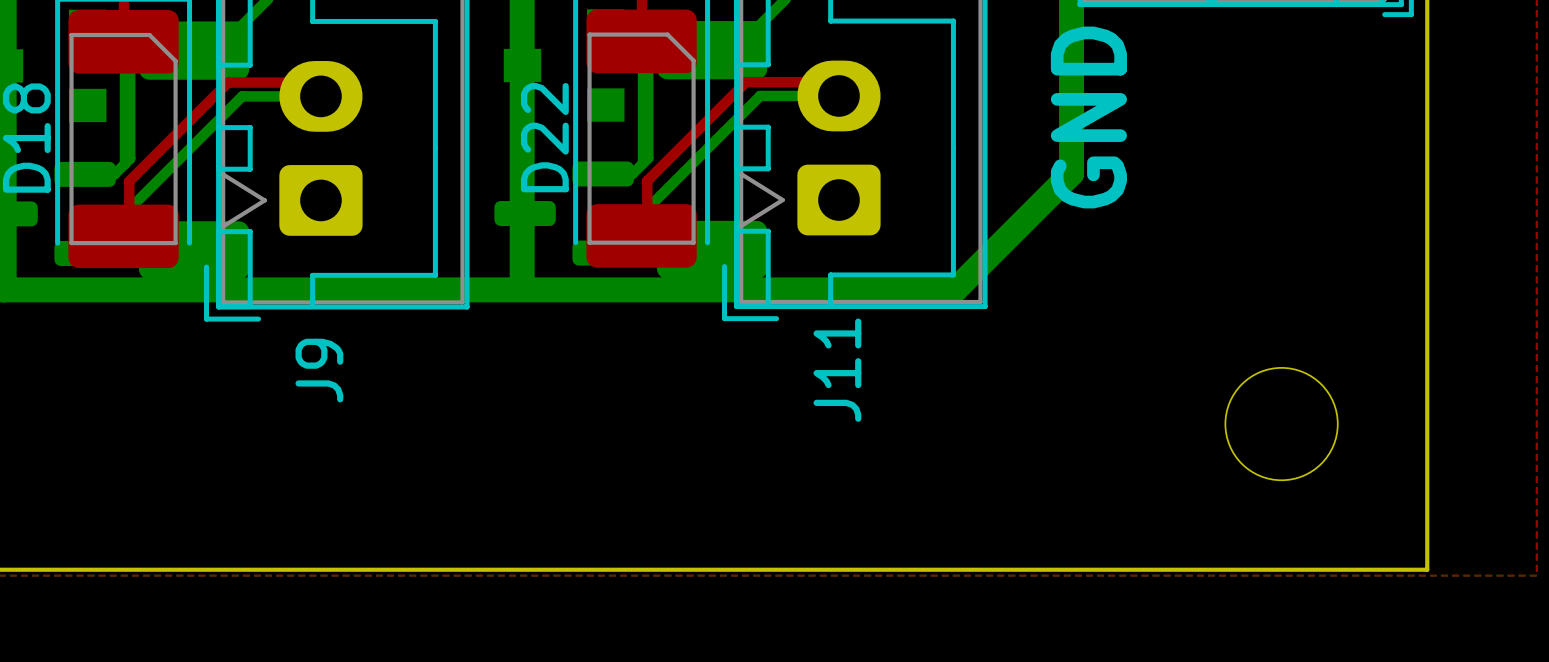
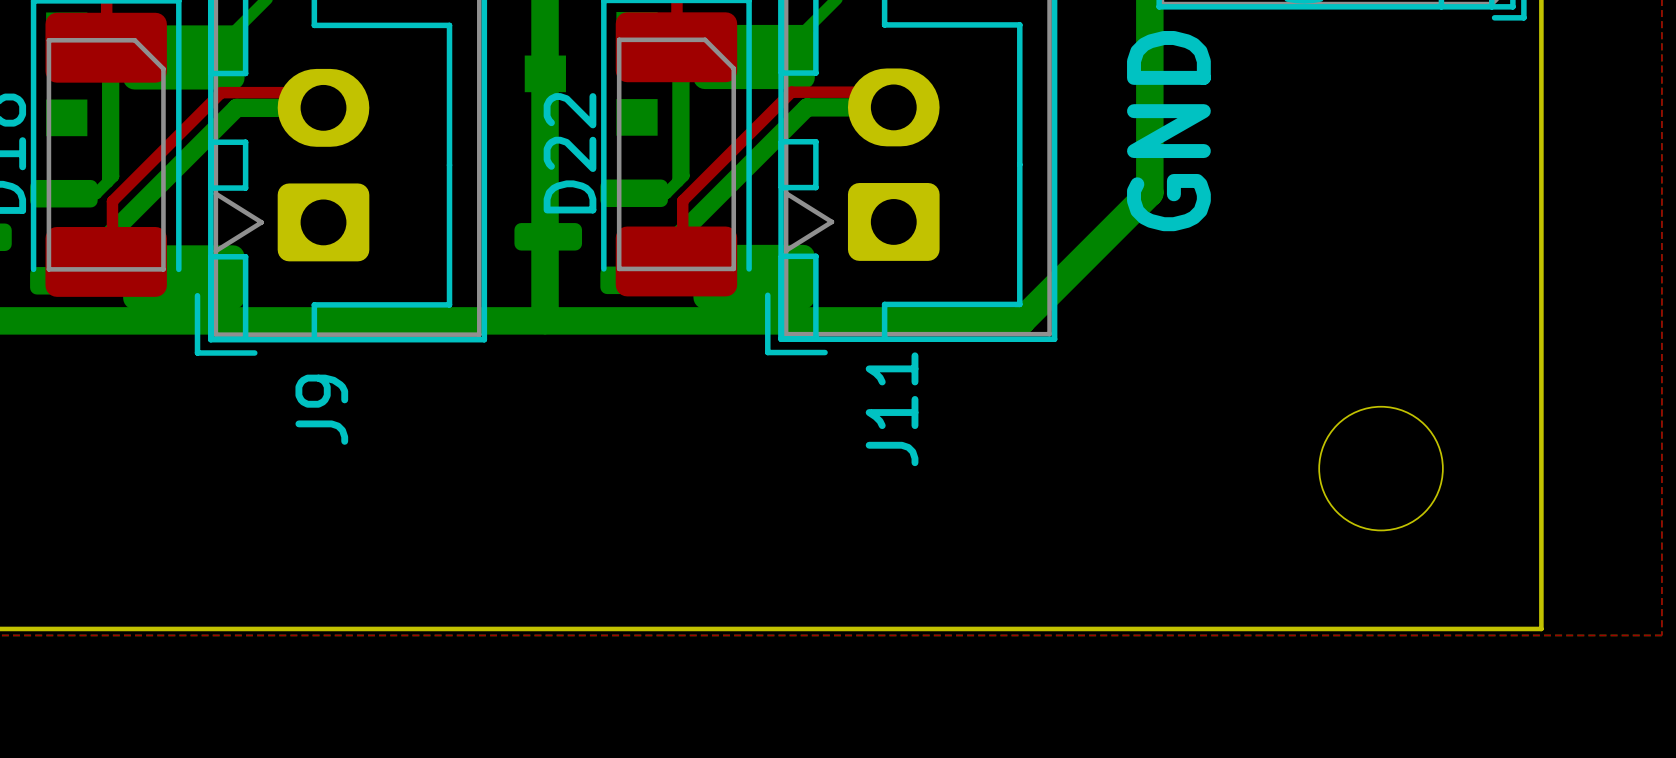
bottom track width: thin (838, 95) (760, 95) (603, 253) -> thick (893, 107) (807, 107) (634, 280)
bottom track width: thin (320, 96) (242, 96) (85, 253) -> thick (323, 107) (236, 107) (63, 280)

